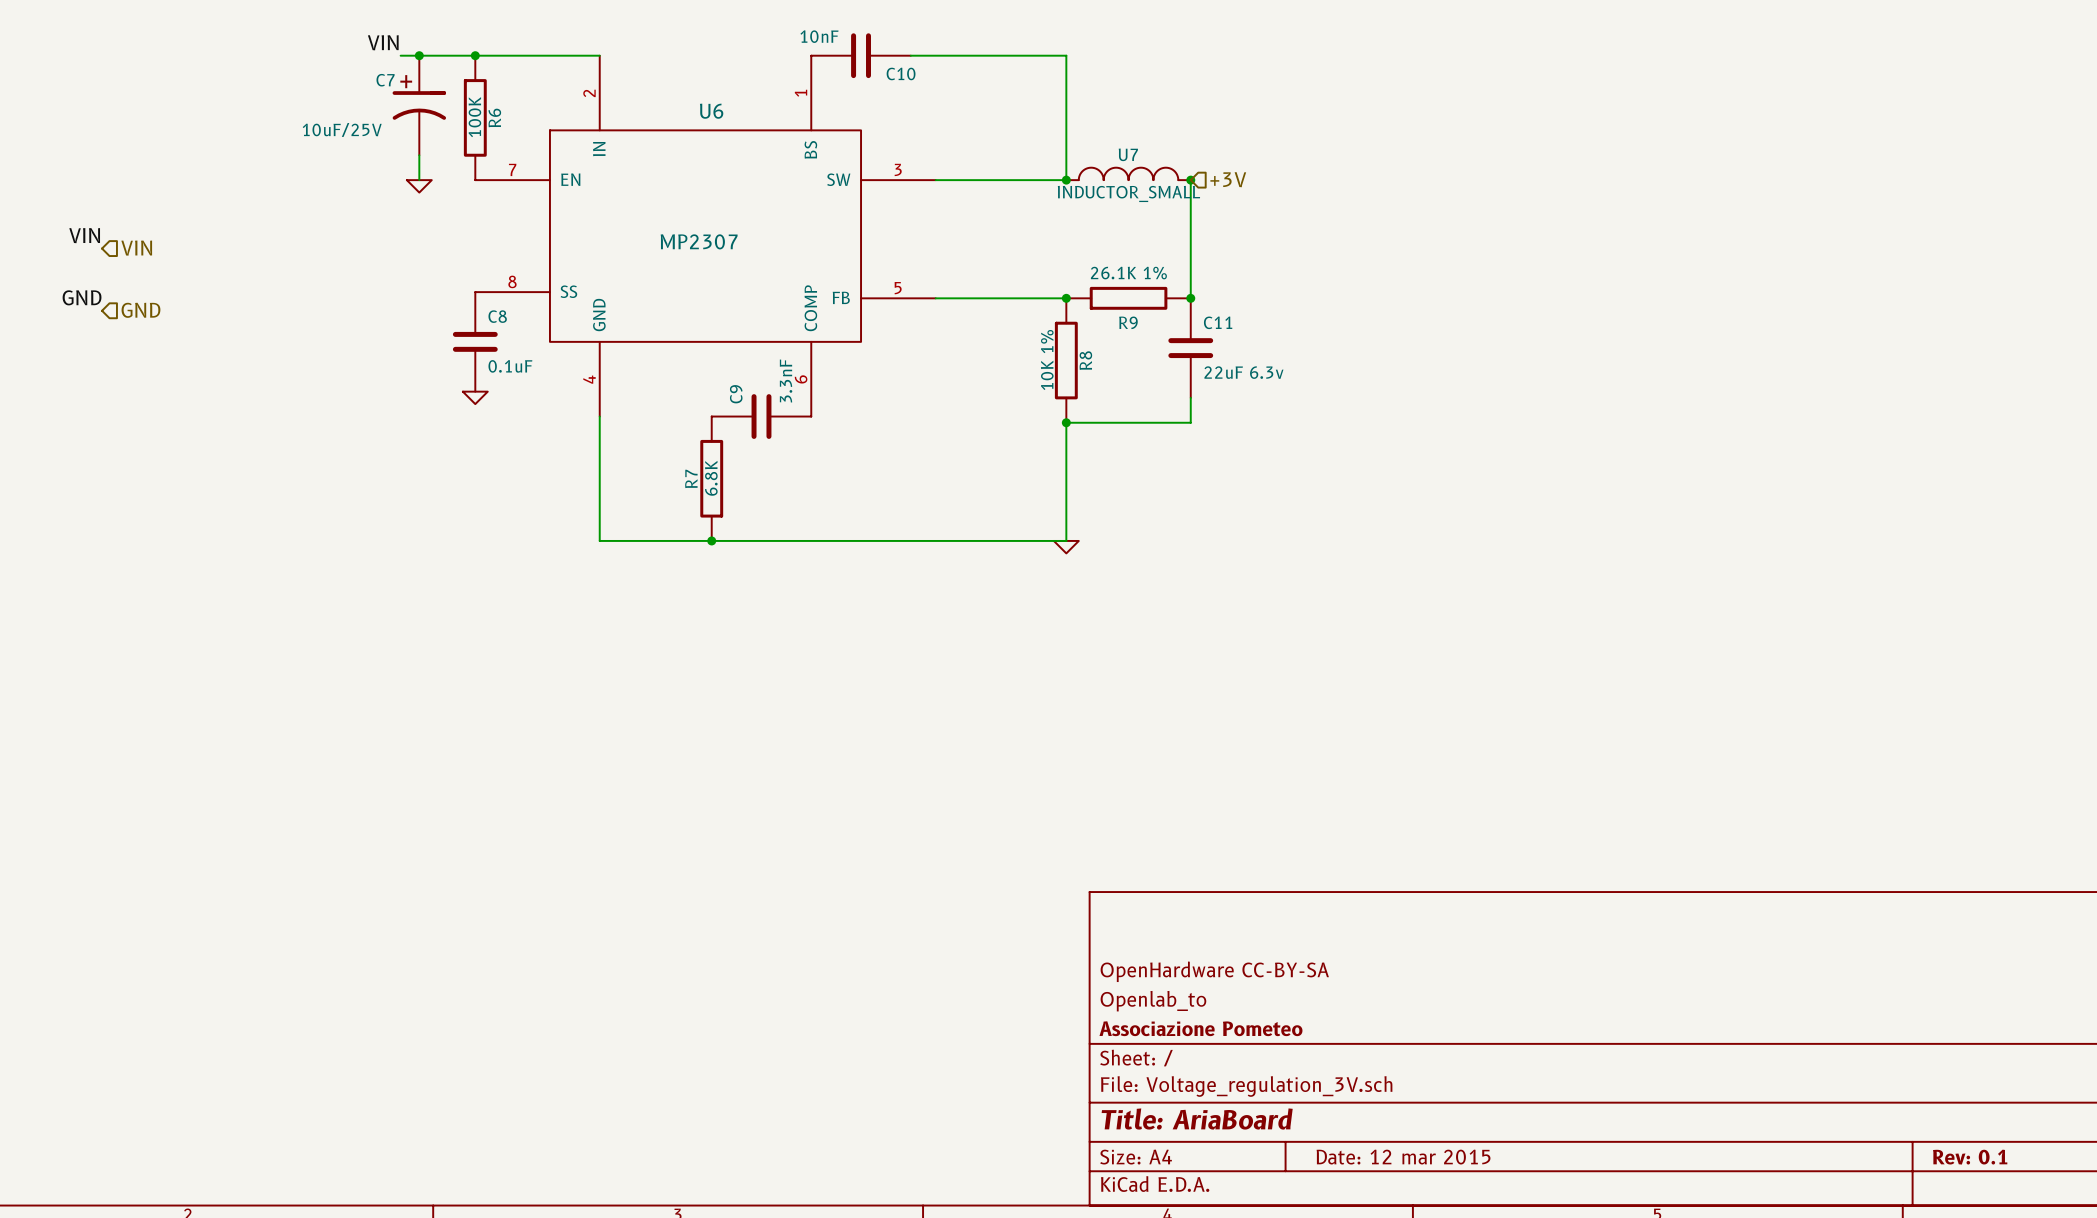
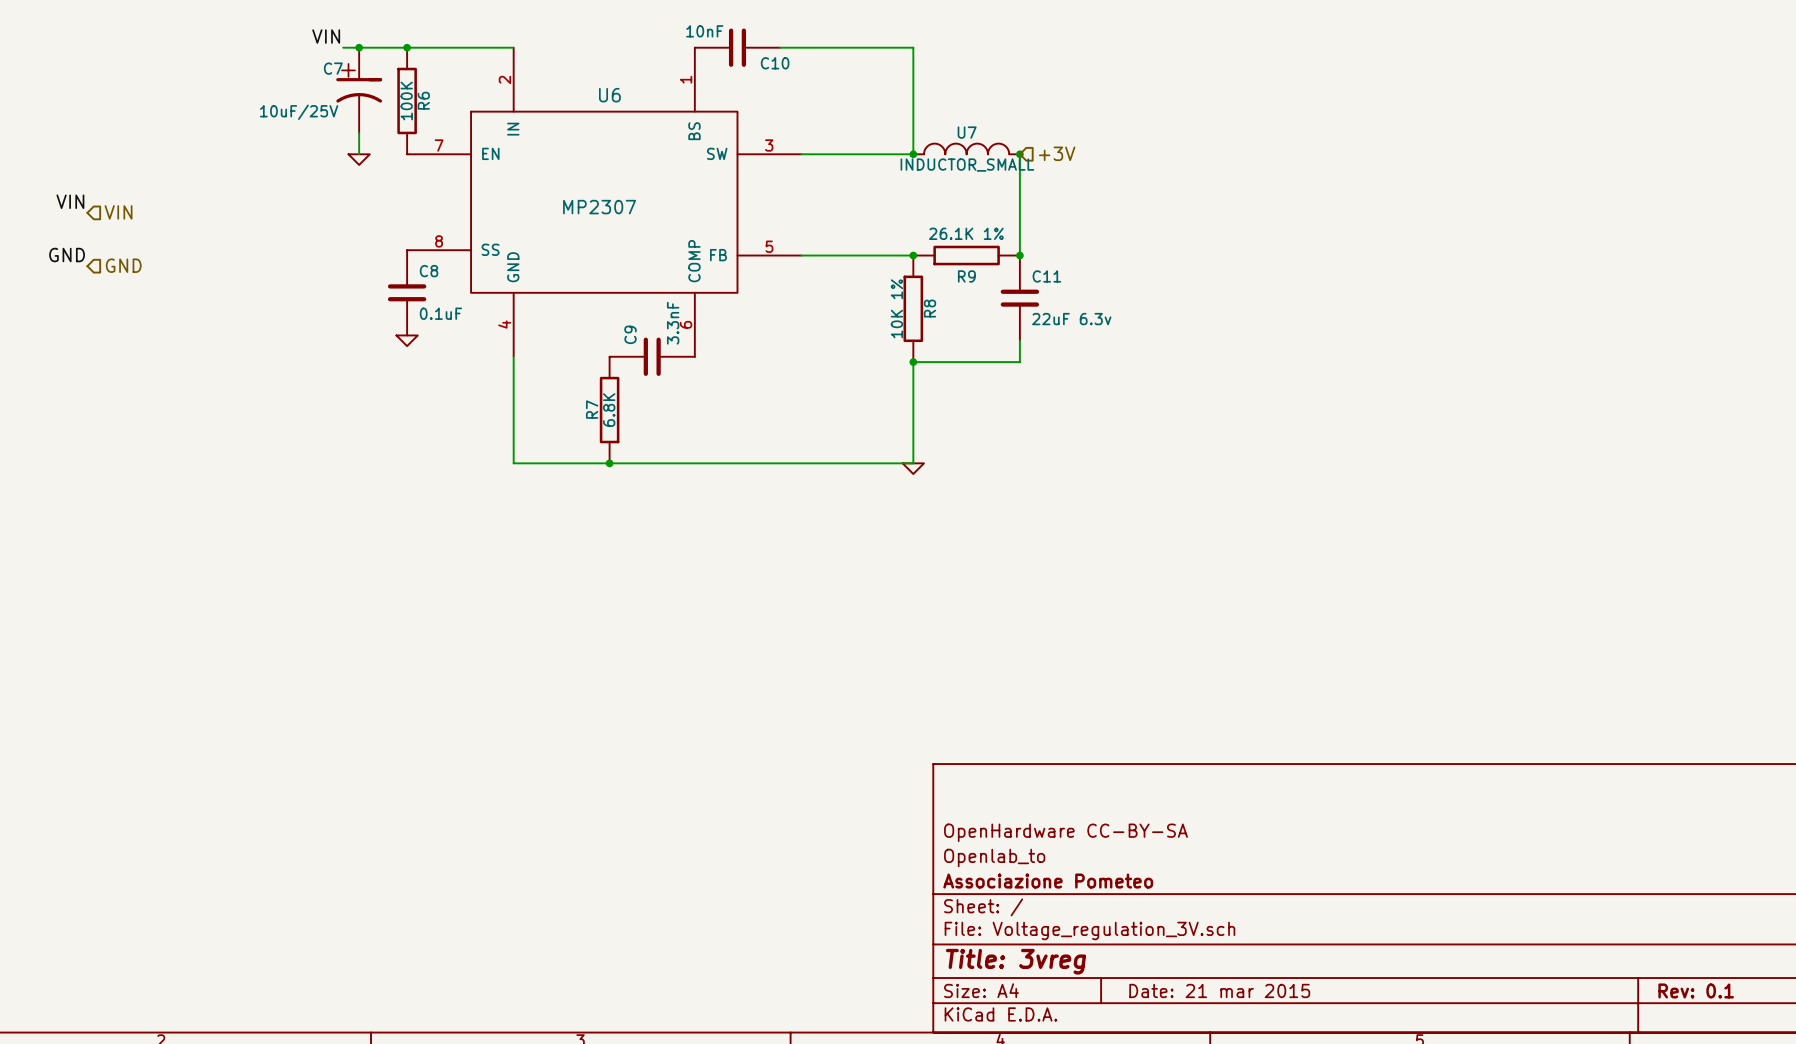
title block: Title: AriaBoard (1197, 1119) -> Title: 3vreg (1015, 961)
title block: Date: 12 mar 2015 (1403, 1157) -> Date: 21 mar 2015 (1219, 990)

